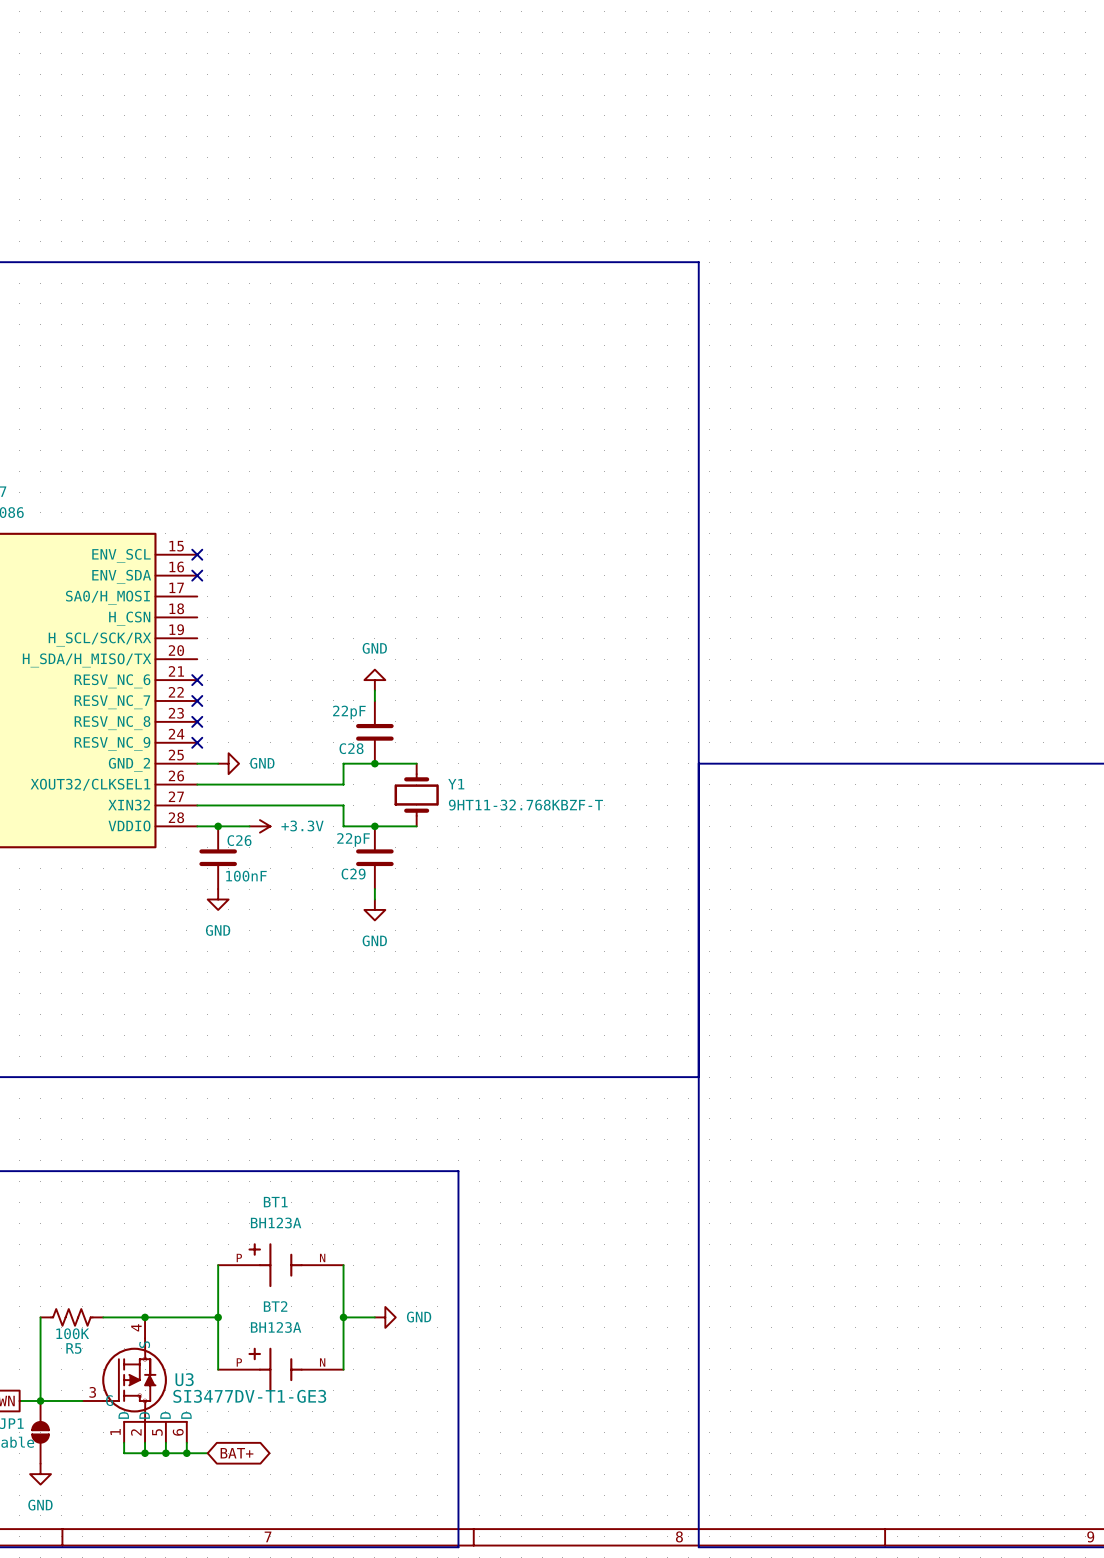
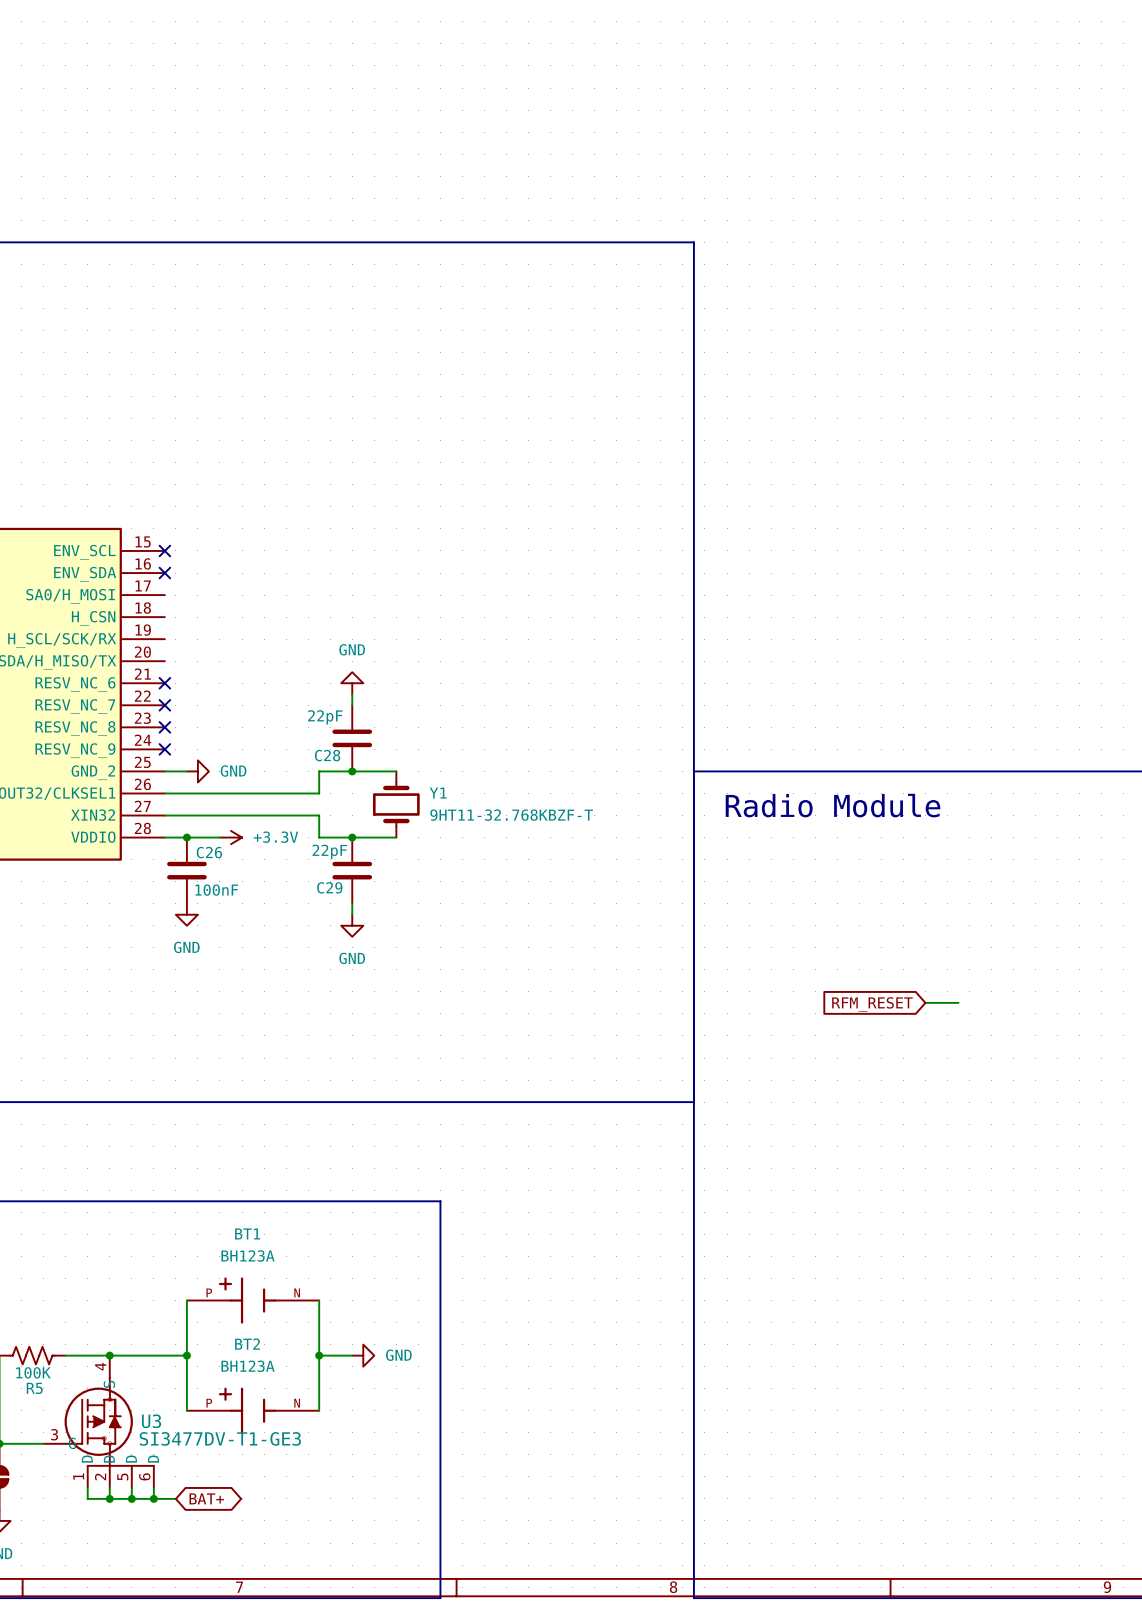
text: none -> Radio Module (833, 805)
wire: none -> (925, 1002) (958, 1002)
global label: none -> RFM_RESET (872, 1004)

